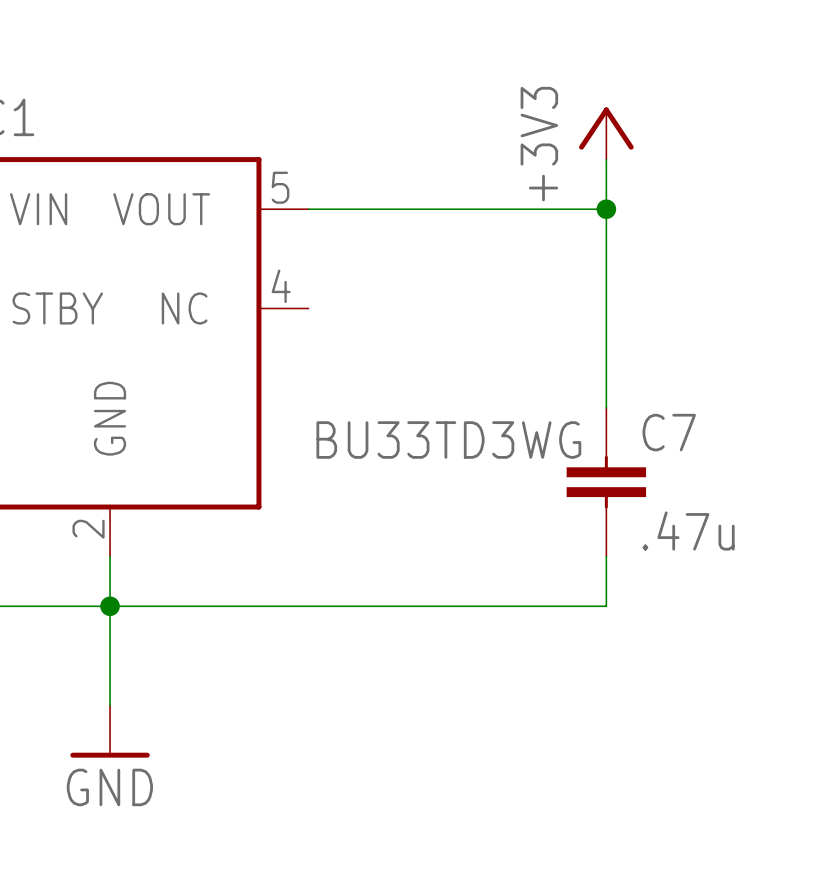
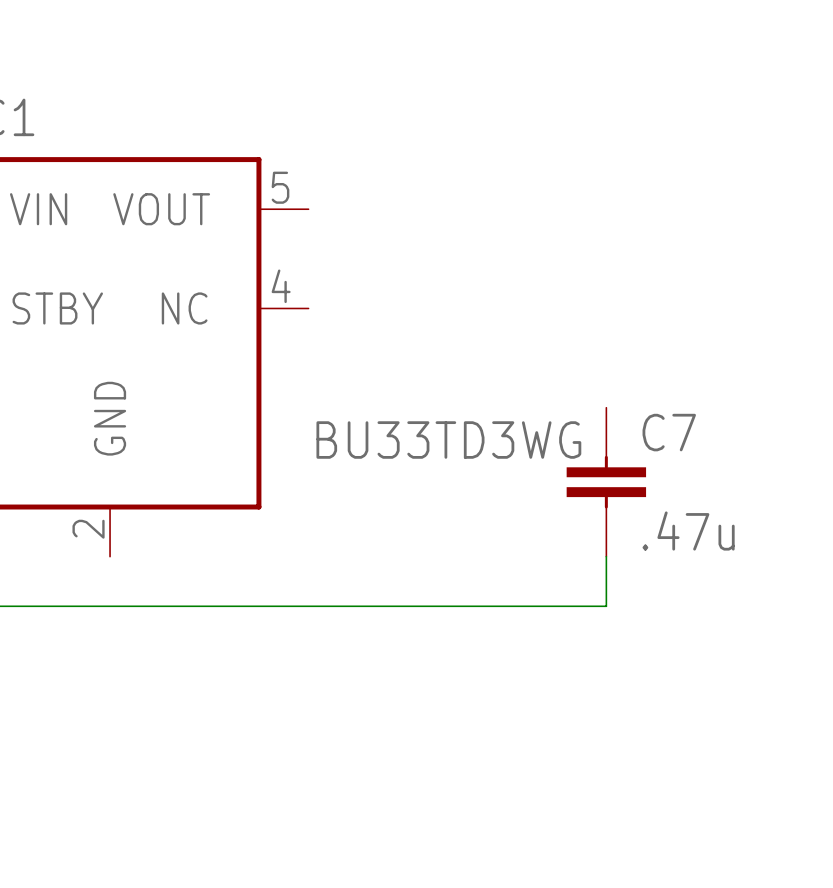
power symbol: +3V3 (606, 133) -> none
wire: (606, 159) (606, 407) -> none
wire: (308, 209) (606, 209) -> none
junction: (606, 209) -> none
wire: (110, 556) (110, 705) -> none
junction: (110, 606) -> none
power symbol: GND (110, 731) -> none

